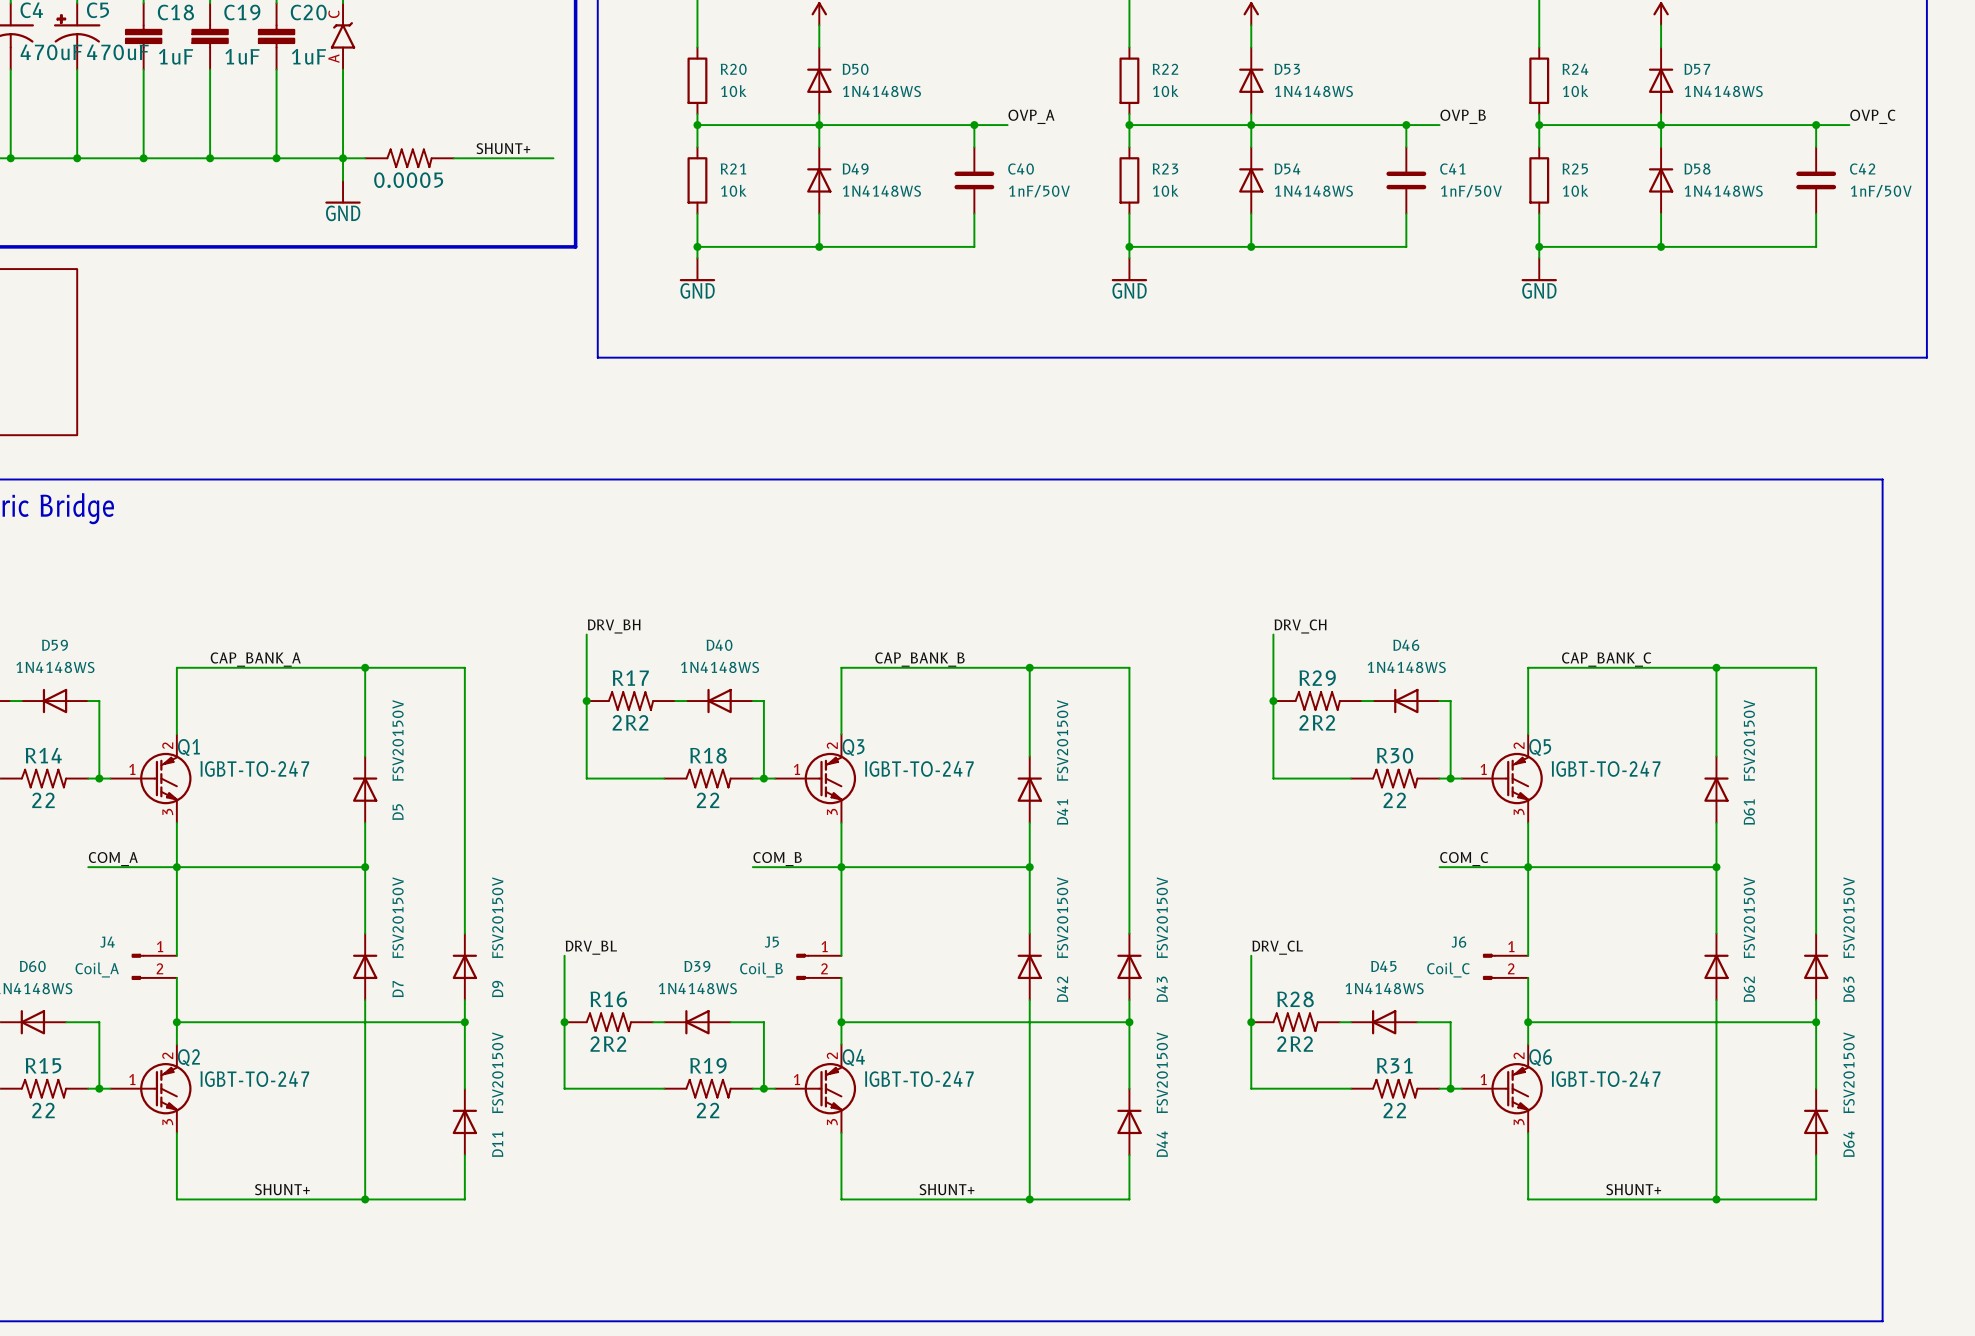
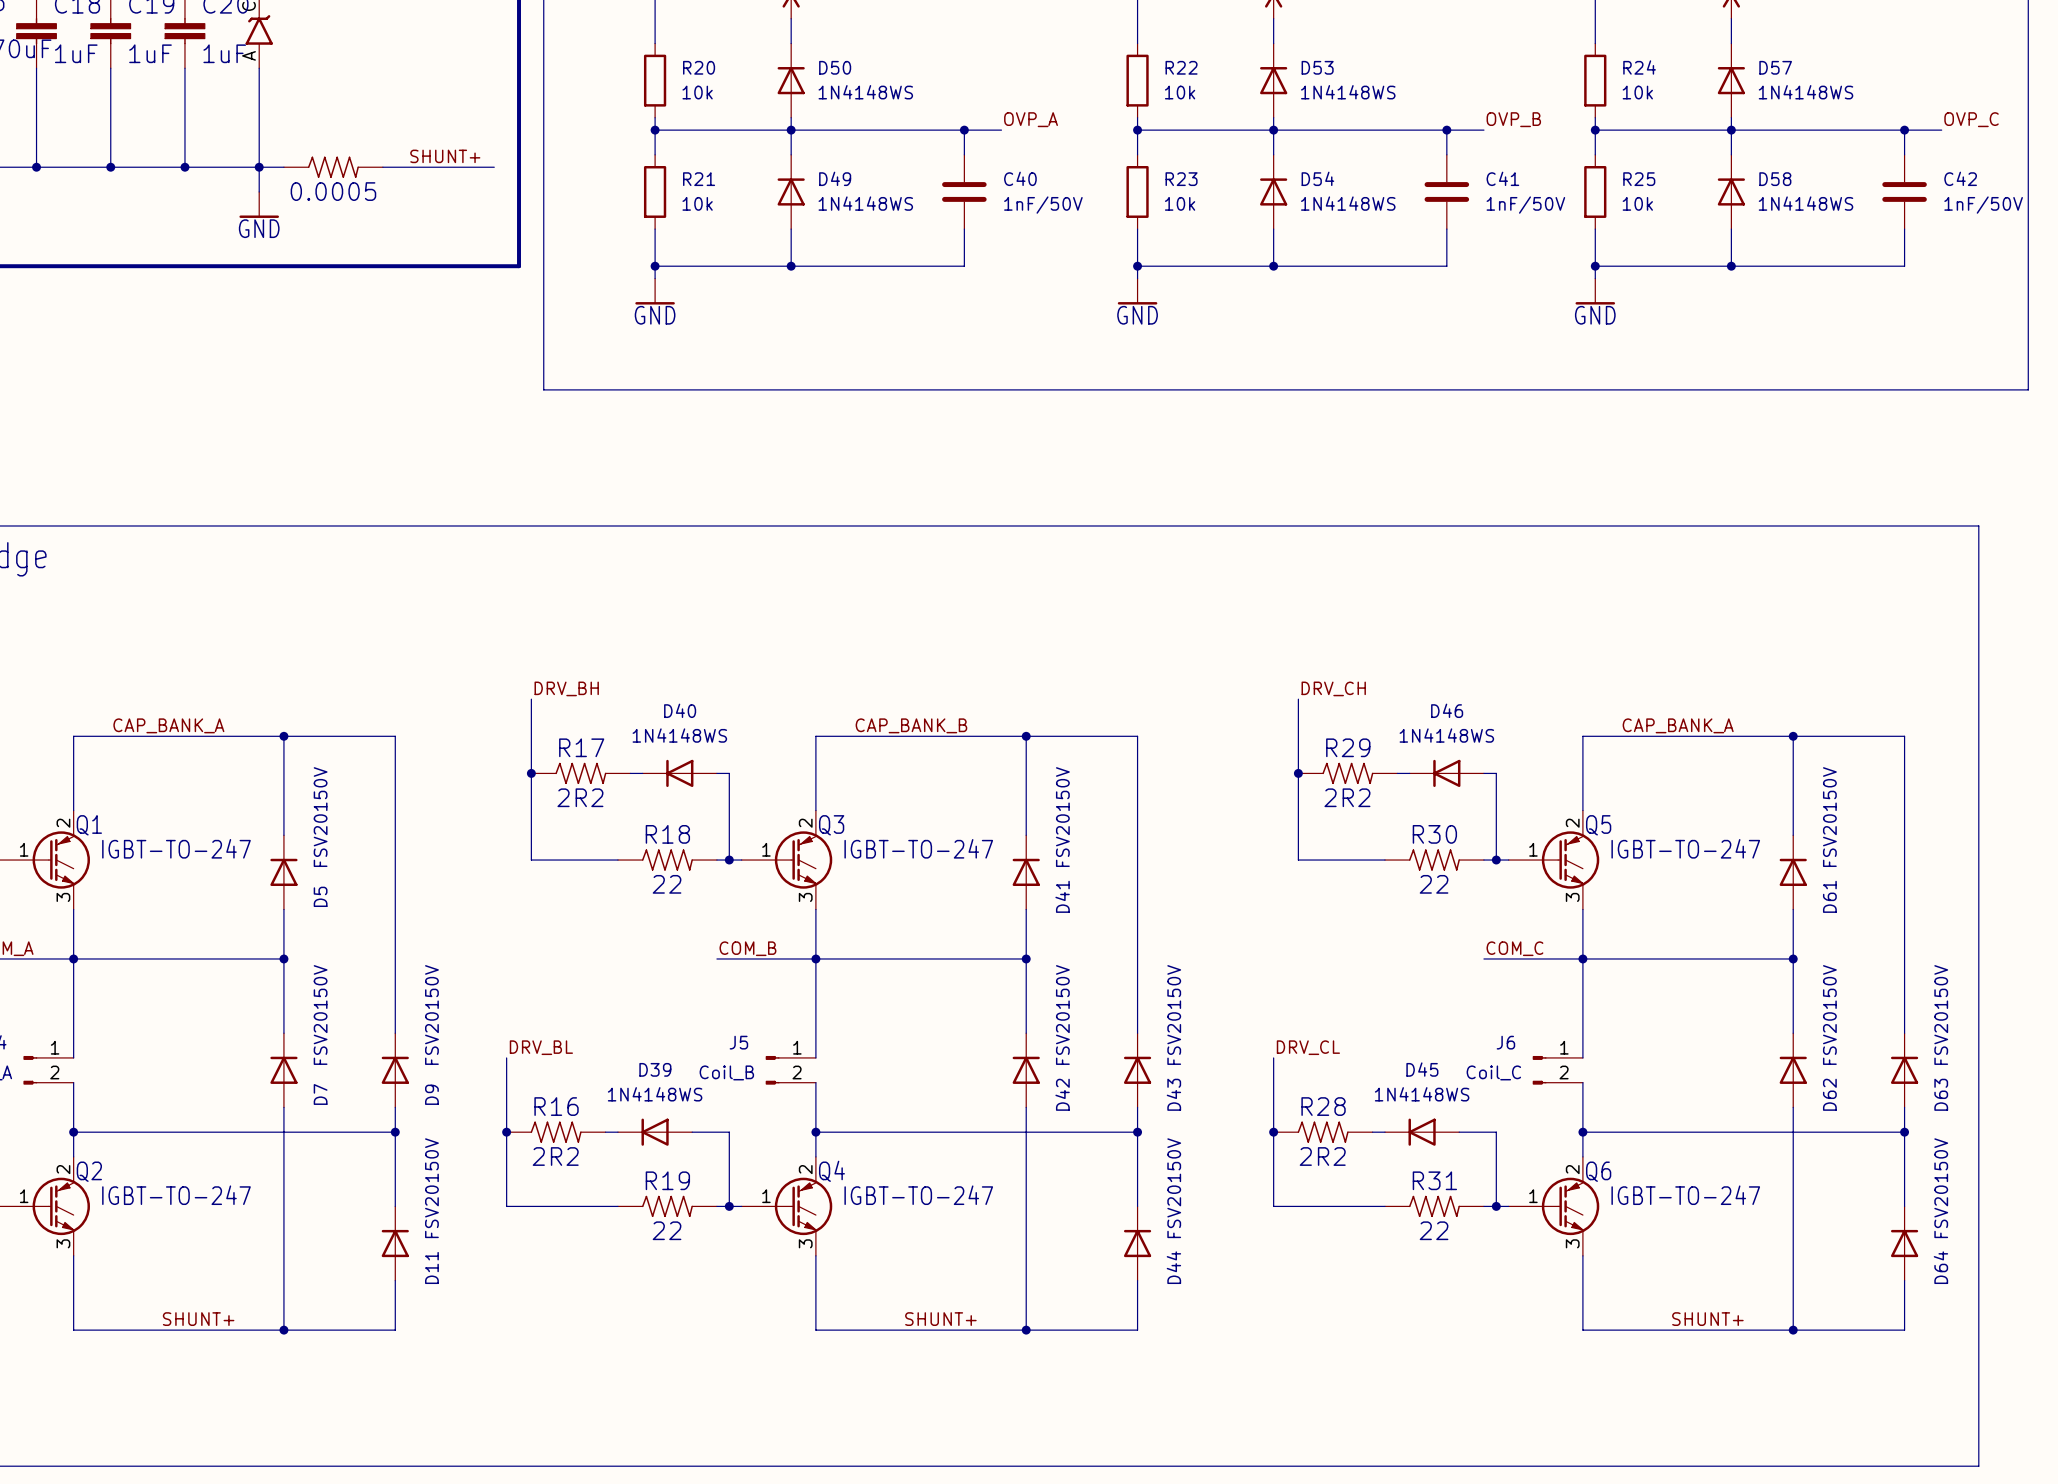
label: CAP_BANK_C (1606, 659) -> CAP_BANK_A (1678, 725)

